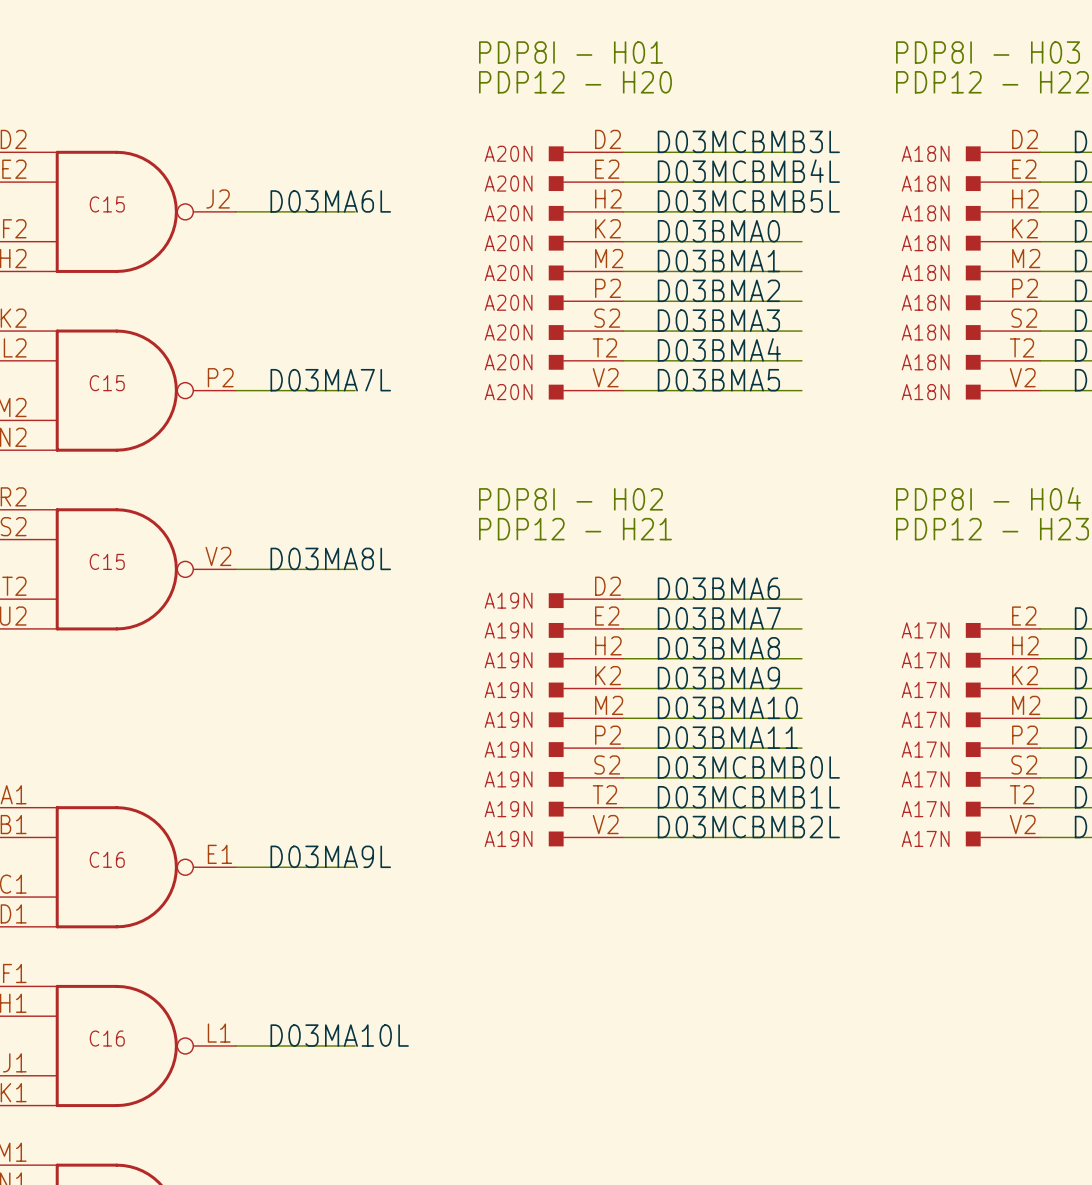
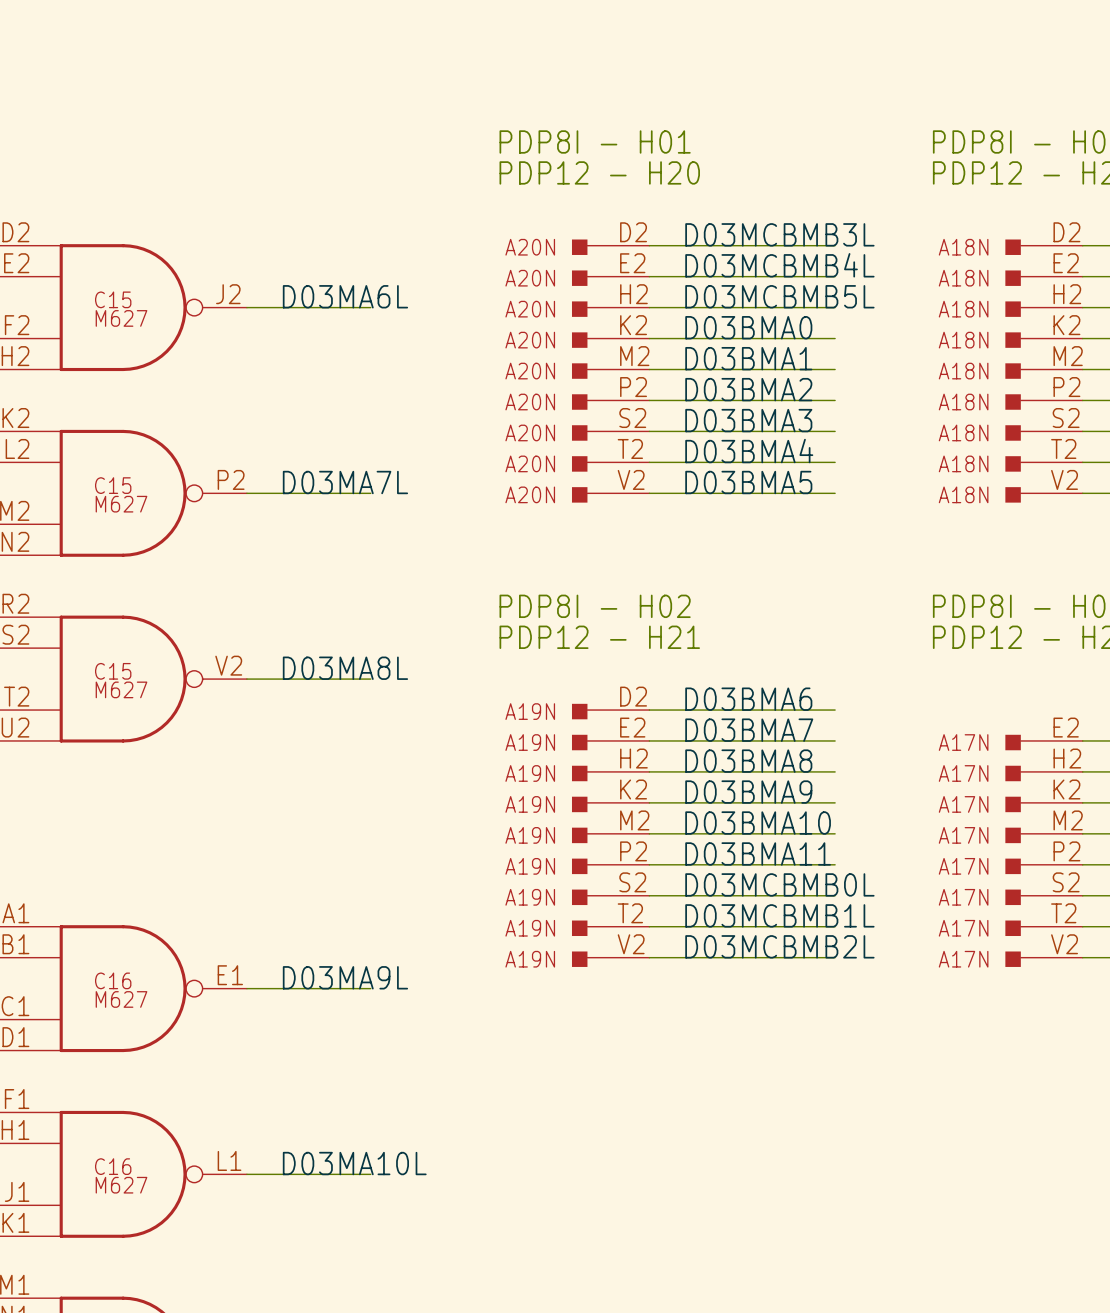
C15 value: none -> M627 (121, 318)
C15 value: none -> M627 (121, 504)
C15 value: none -> M627 (121, 689)
C16 value: none -> M627 (121, 999)
C16 value: none -> M627 (121, 1185)

